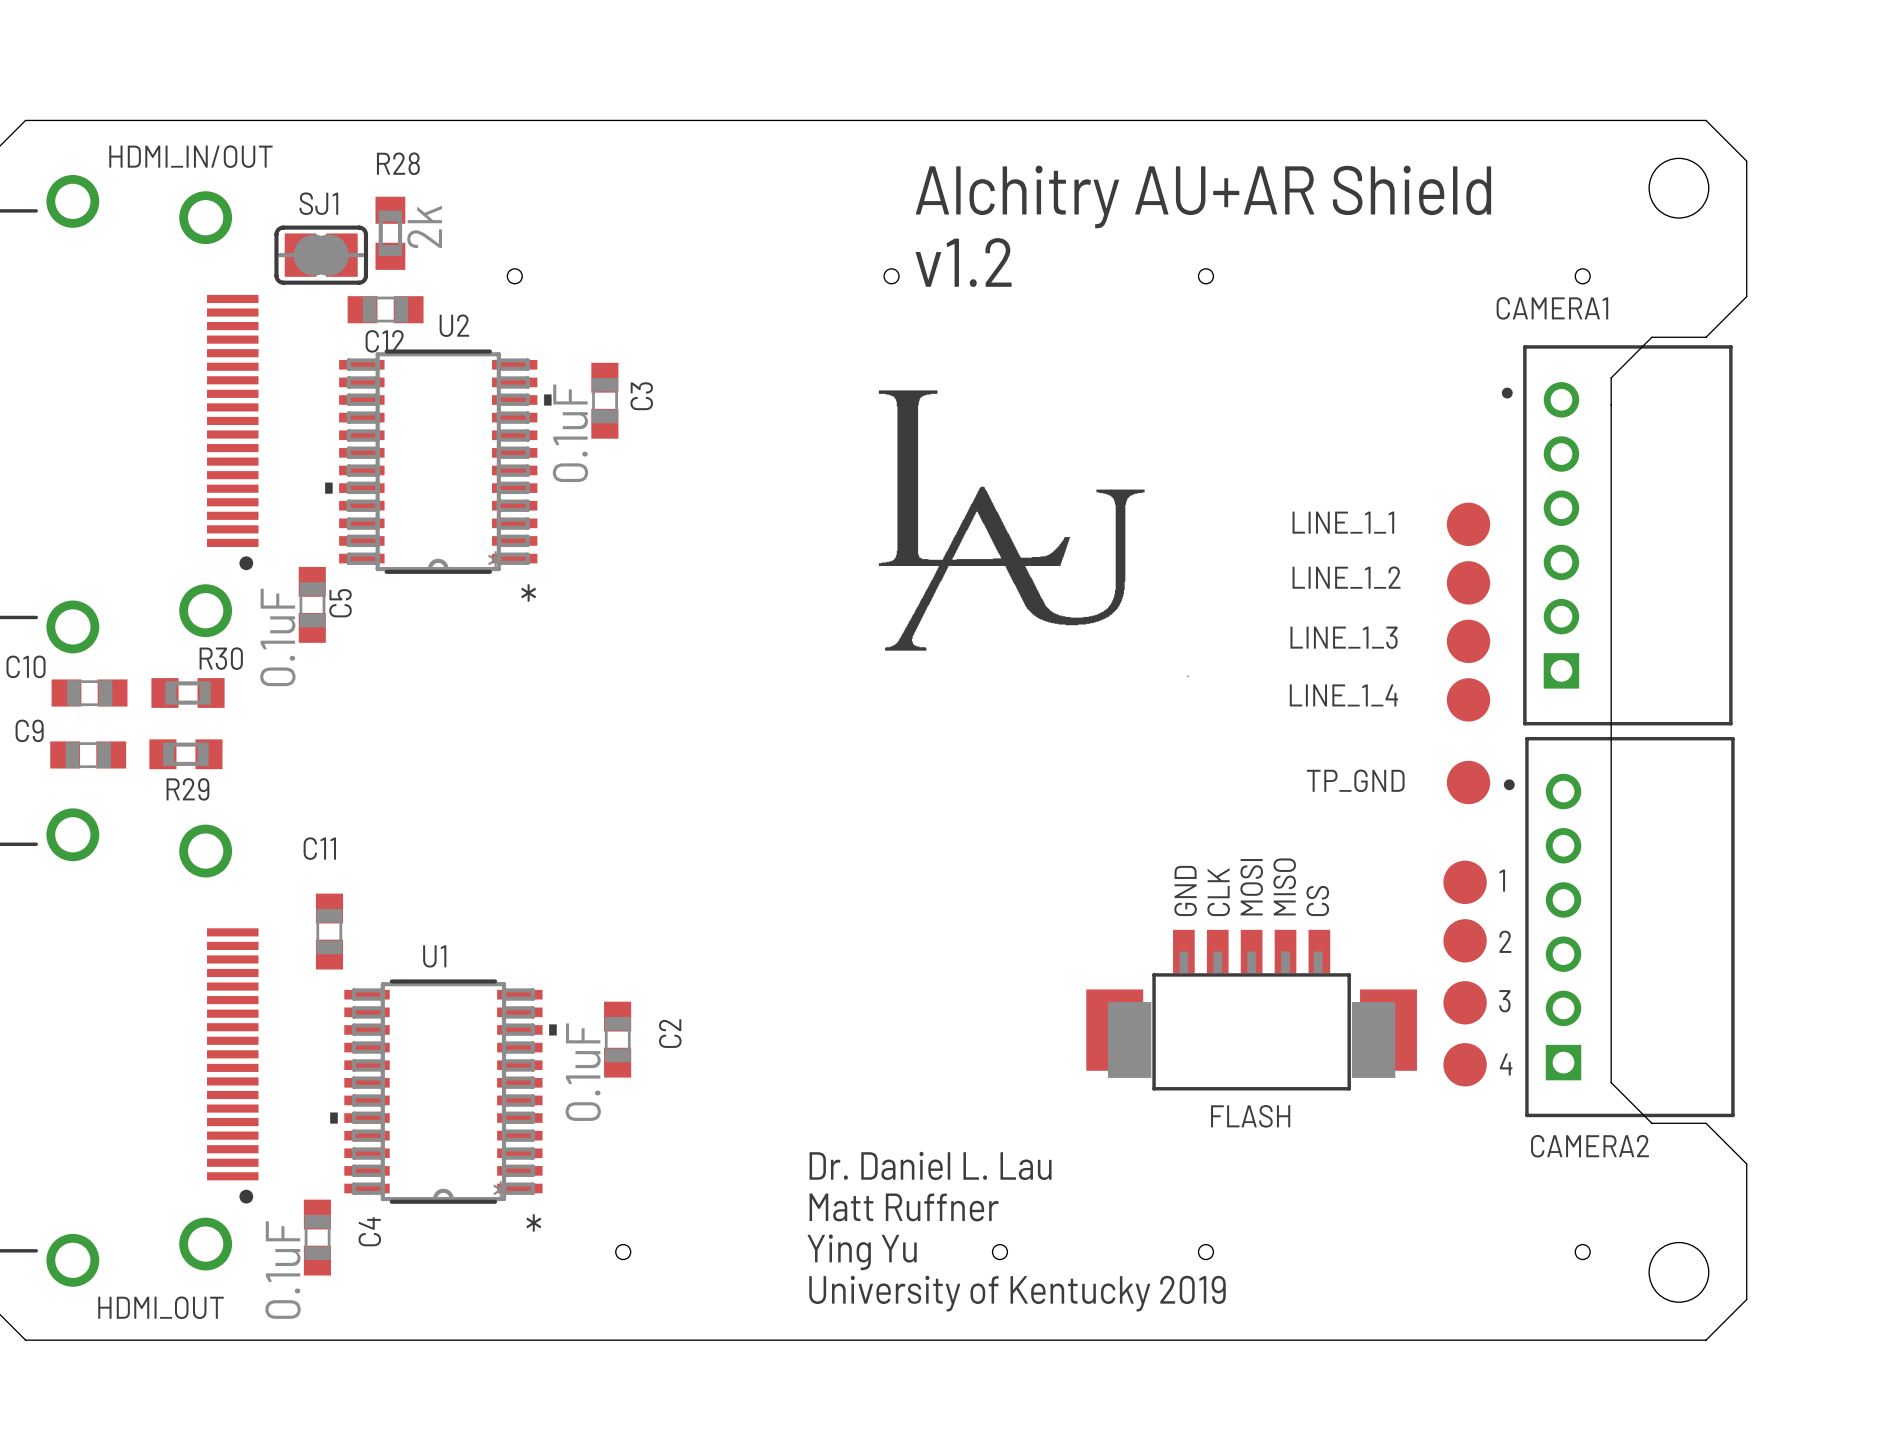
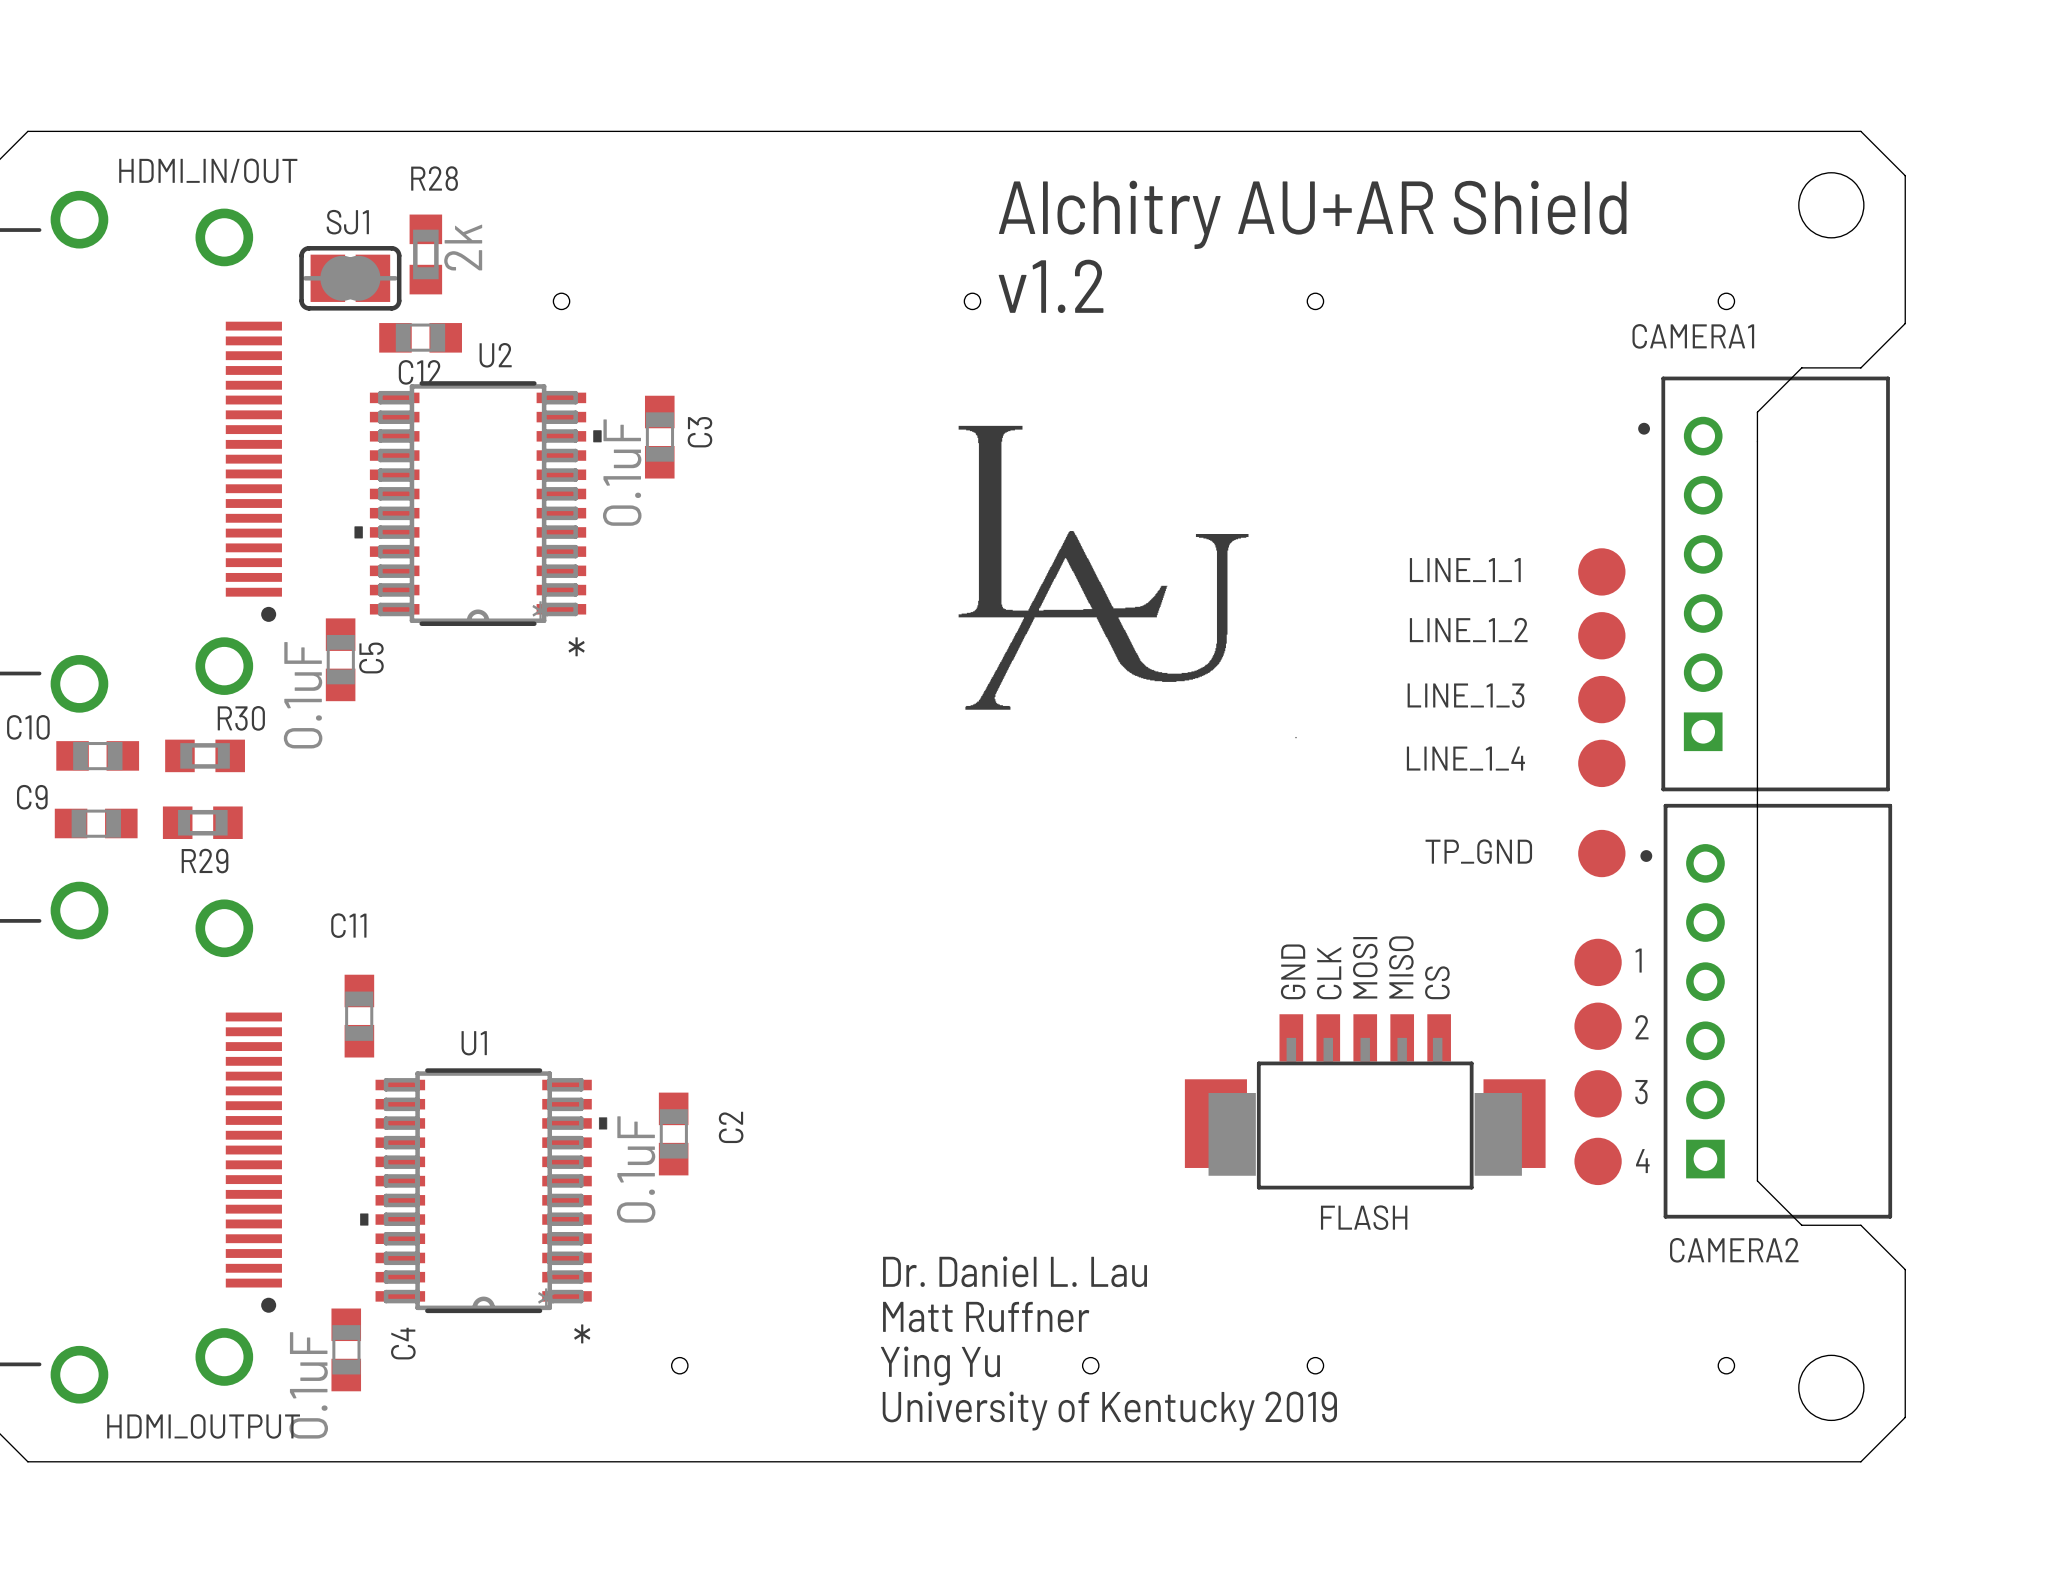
HDMI_OUT name: HDMI_OUT (161, 1307) -> HDMI_OUTPUT (203, 1426)

